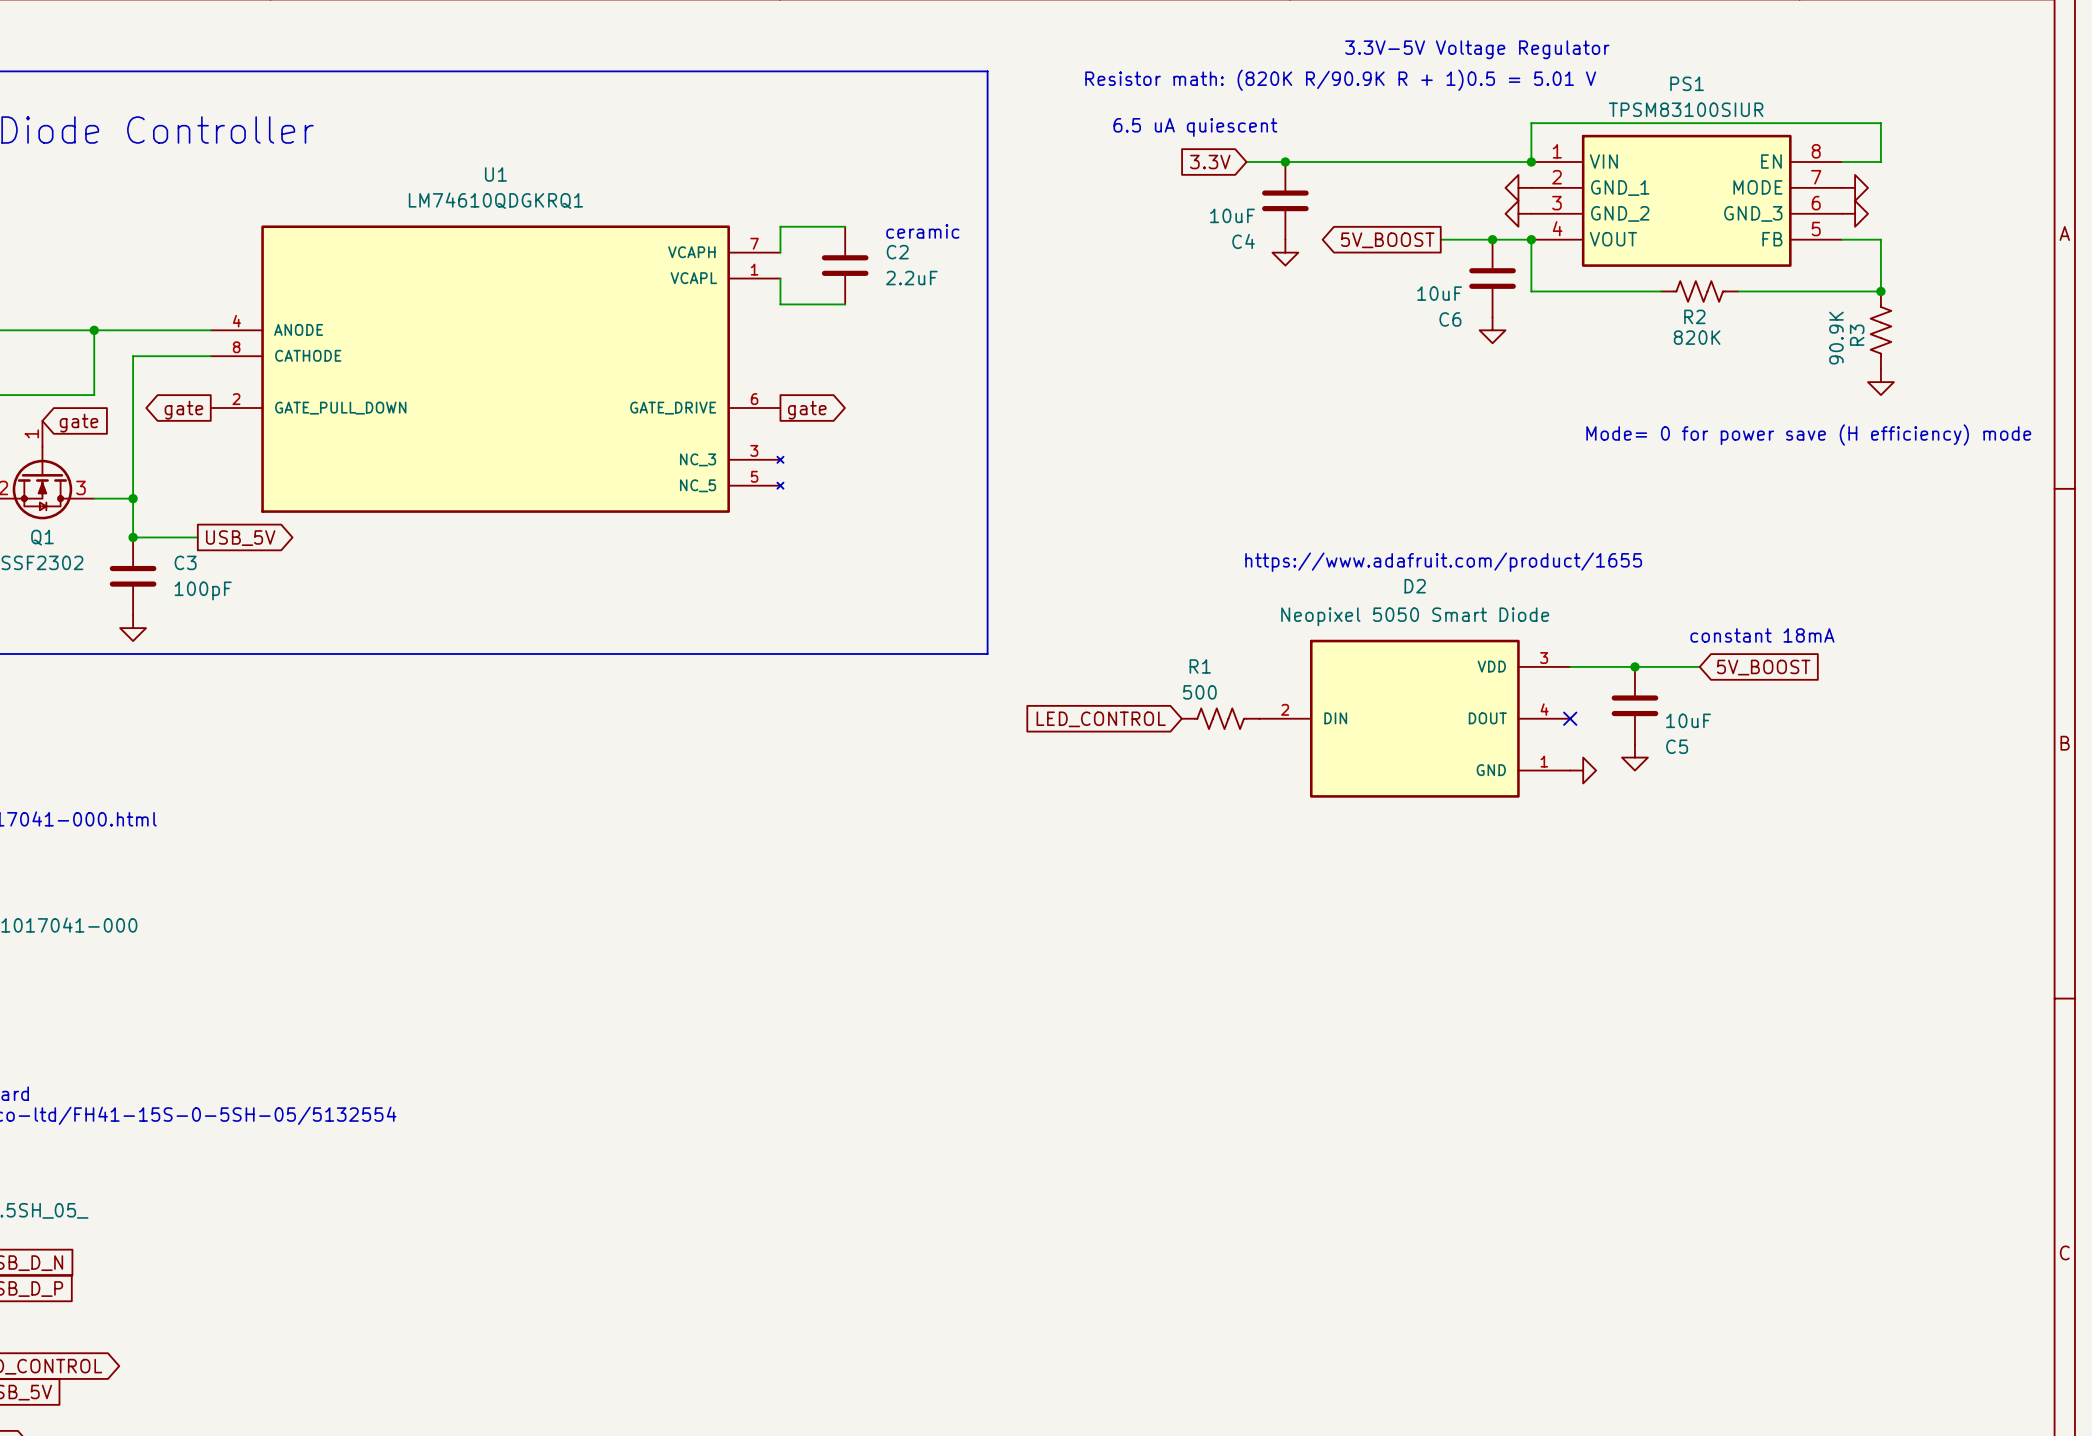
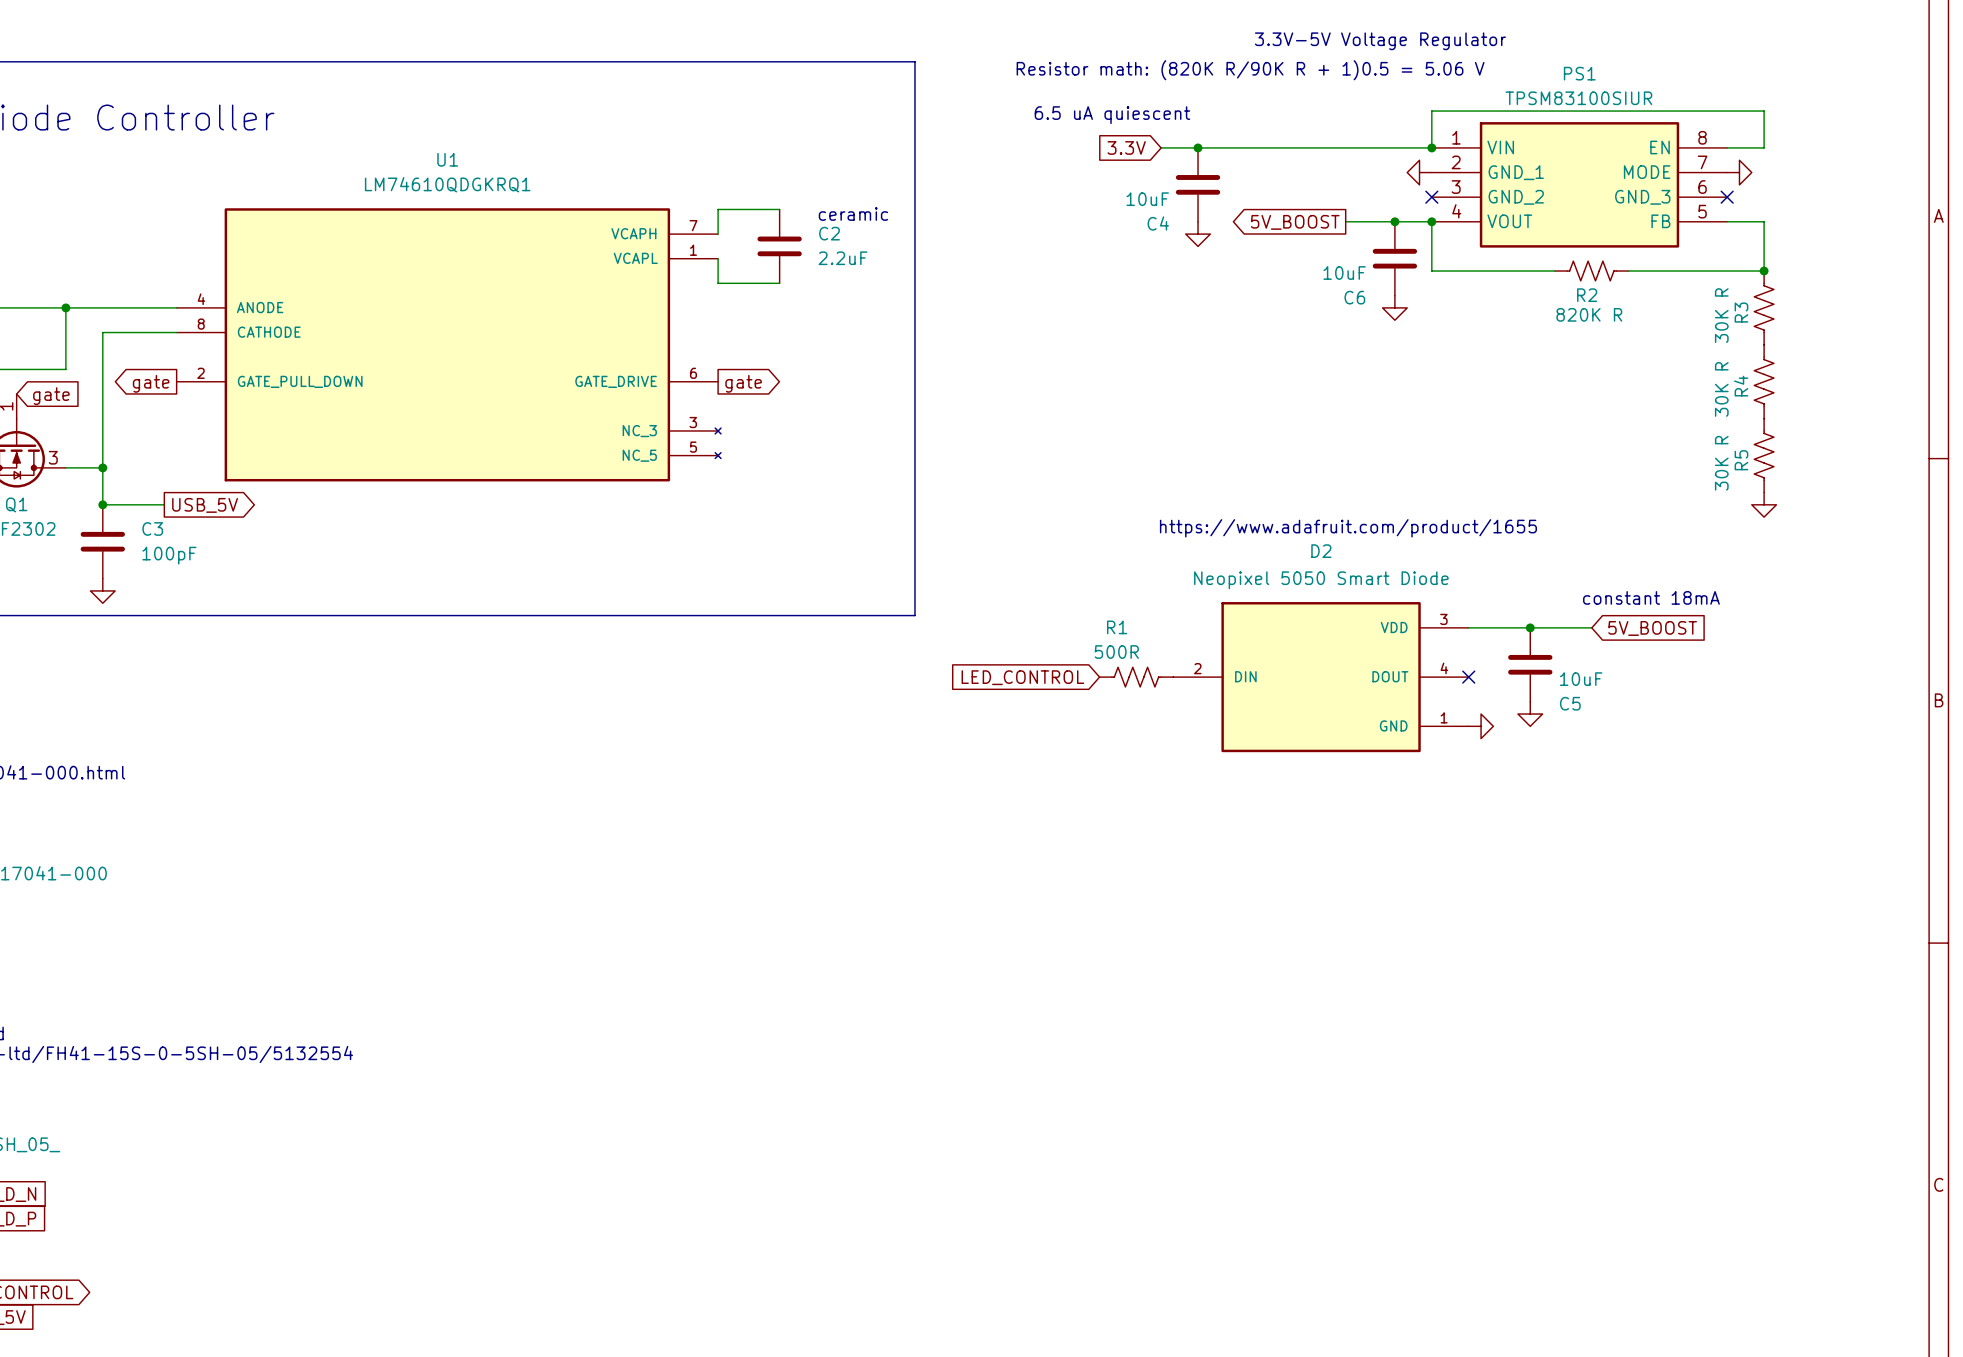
text: Resistor math: (820K R/90.9K R + 1)0.5 = 5.01 V (1340, 80) -> Resistor math: (820K R/90K R + 1)0.5 = 5.06 V (1250, 70)
power symbol: (1518, 213) -> none
no-connect mark: none -> (1431, 197)
no-connect mark: none -> (1727, 197)
power symbol: (1855, 213) -> none
R2 value: 820K (1697, 337) -> 820K R (1589, 314)
R3 value: 90.9K (1836, 338) -> 30K R (1721, 315)
power symbol position: (1880, 382) -> (1764, 504)
R4: none -> 30K R (1764, 381)
text: Mode= 0 for power save (H efficiency) mode (1808, 434) -> none
R5: none -> 30K R (1764, 455)
R1 value: 500 (1199, 692) -> 500R (1116, 652)

